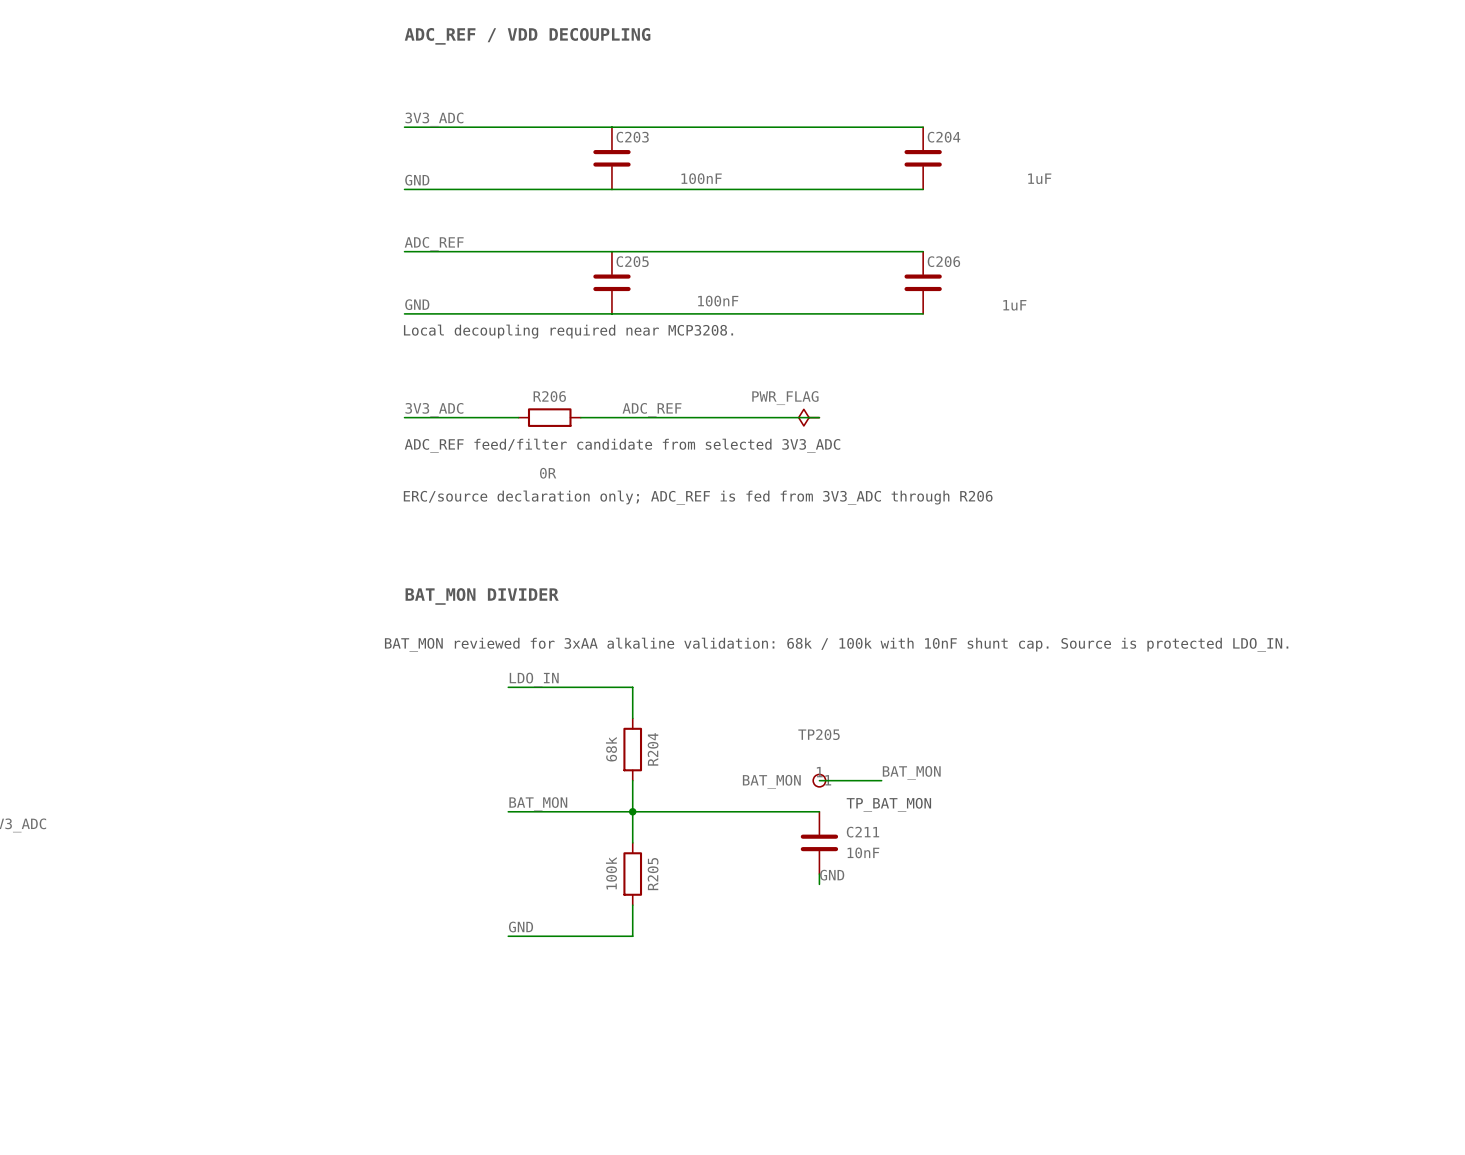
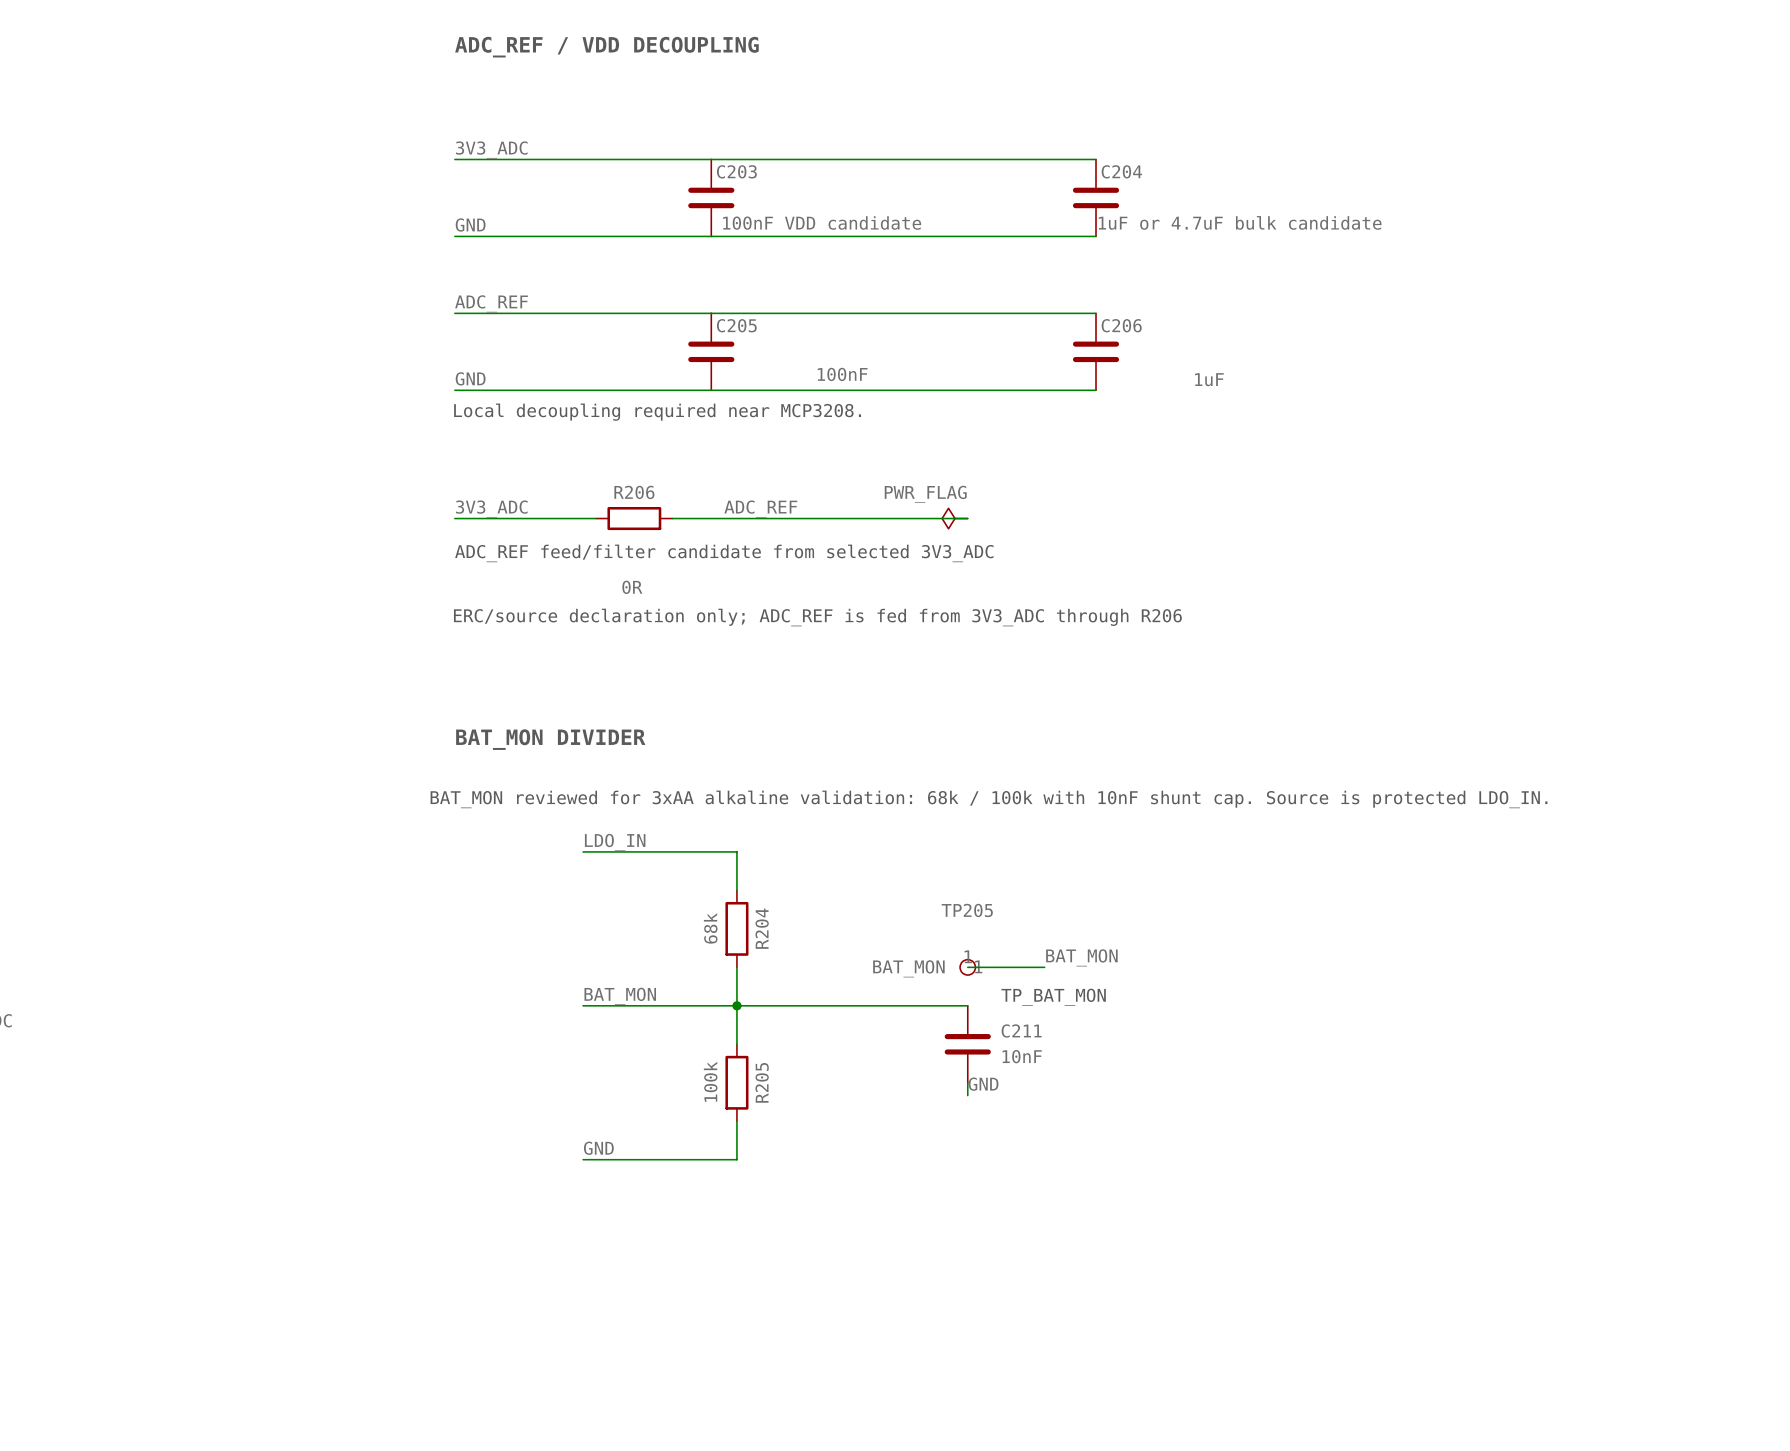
C203 value: 100nF (701, 178) -> 100nF VDD candidate (822, 222)
C204 value: 1uF (1039, 178) -> 1uF or 4.7uF bulk candidate (1240, 222)

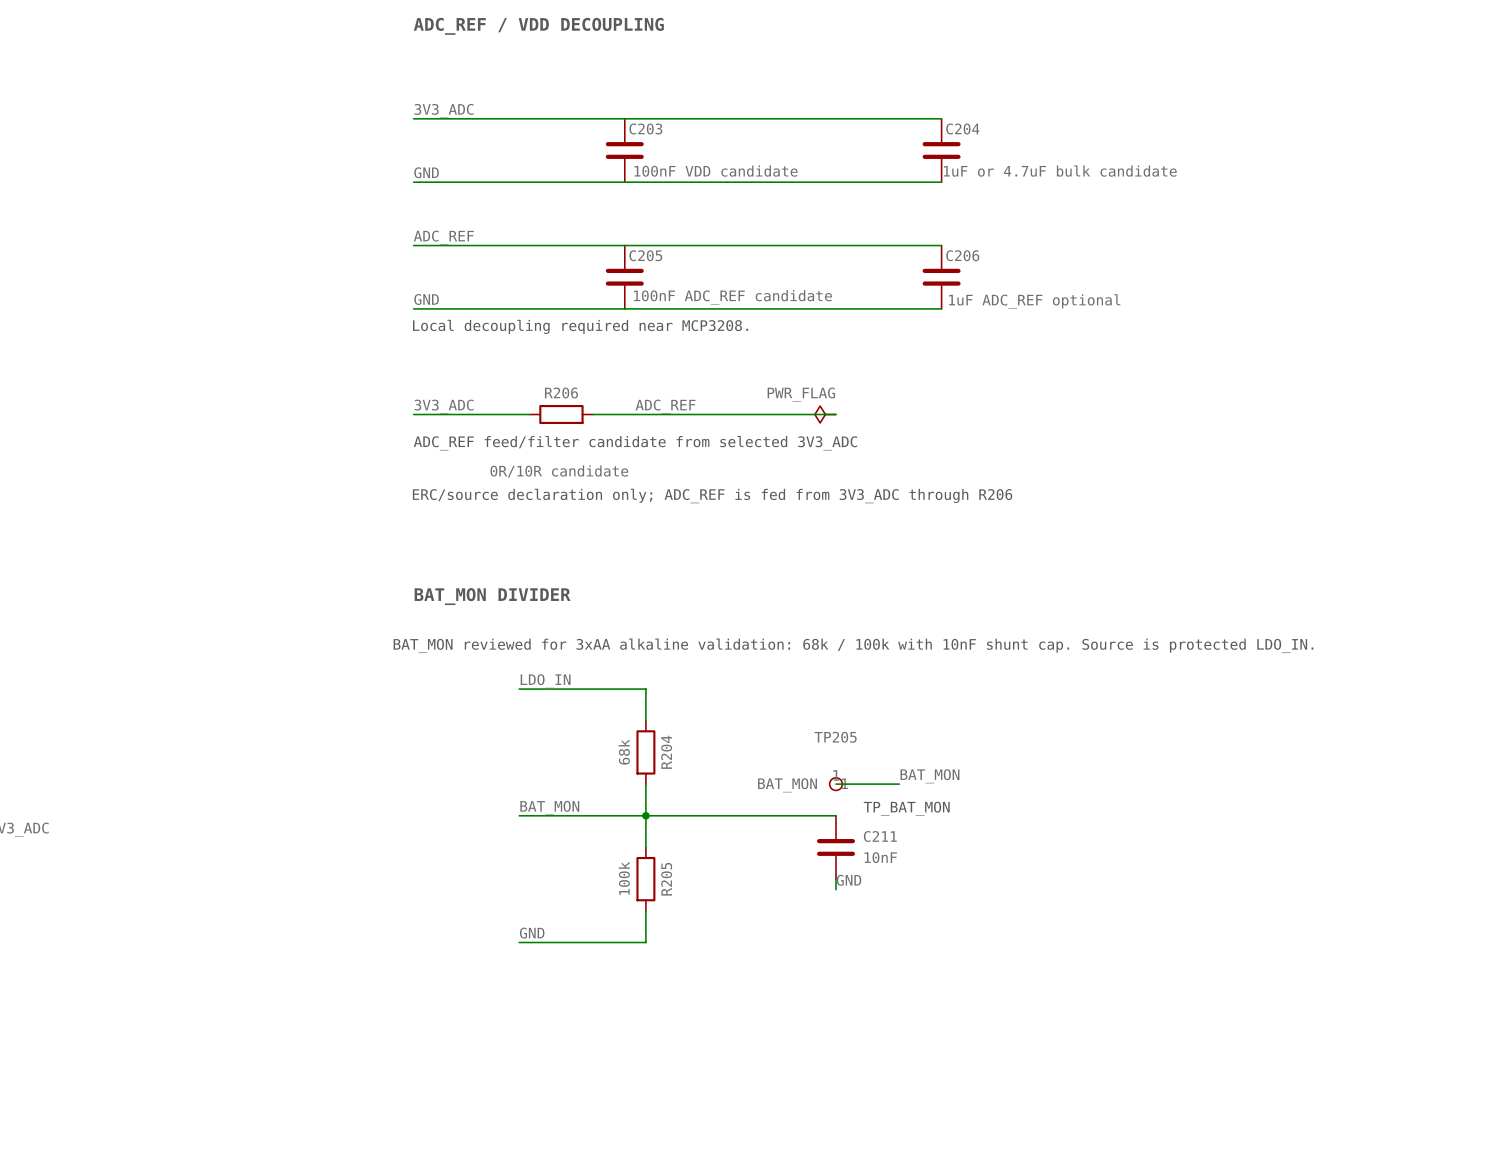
C205 value: 100nF (842, 374) -> 100nF ADC_REF candidate (732, 297)
C206 value: 1uF (1209, 379) -> 1uF ADC_REF optional (1034, 301)
R206 value: 0R (632, 587) -> 0R/10R candidate (559, 471)

